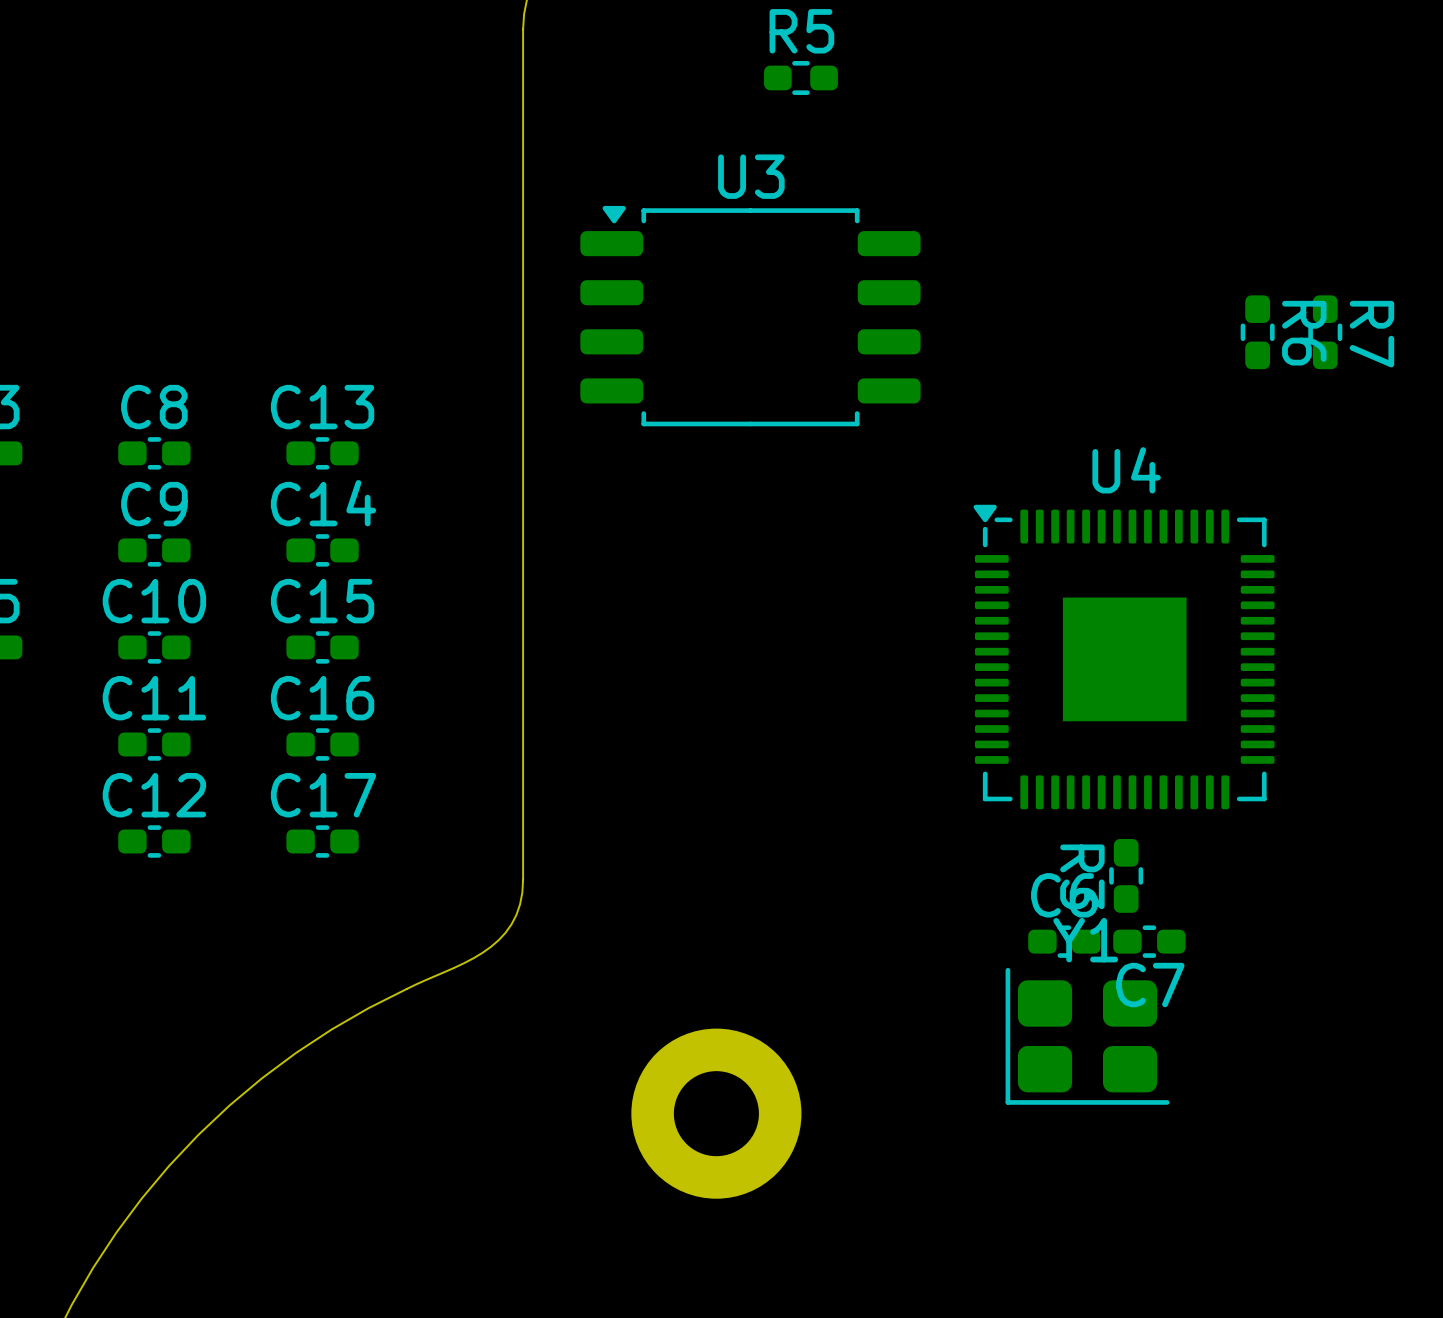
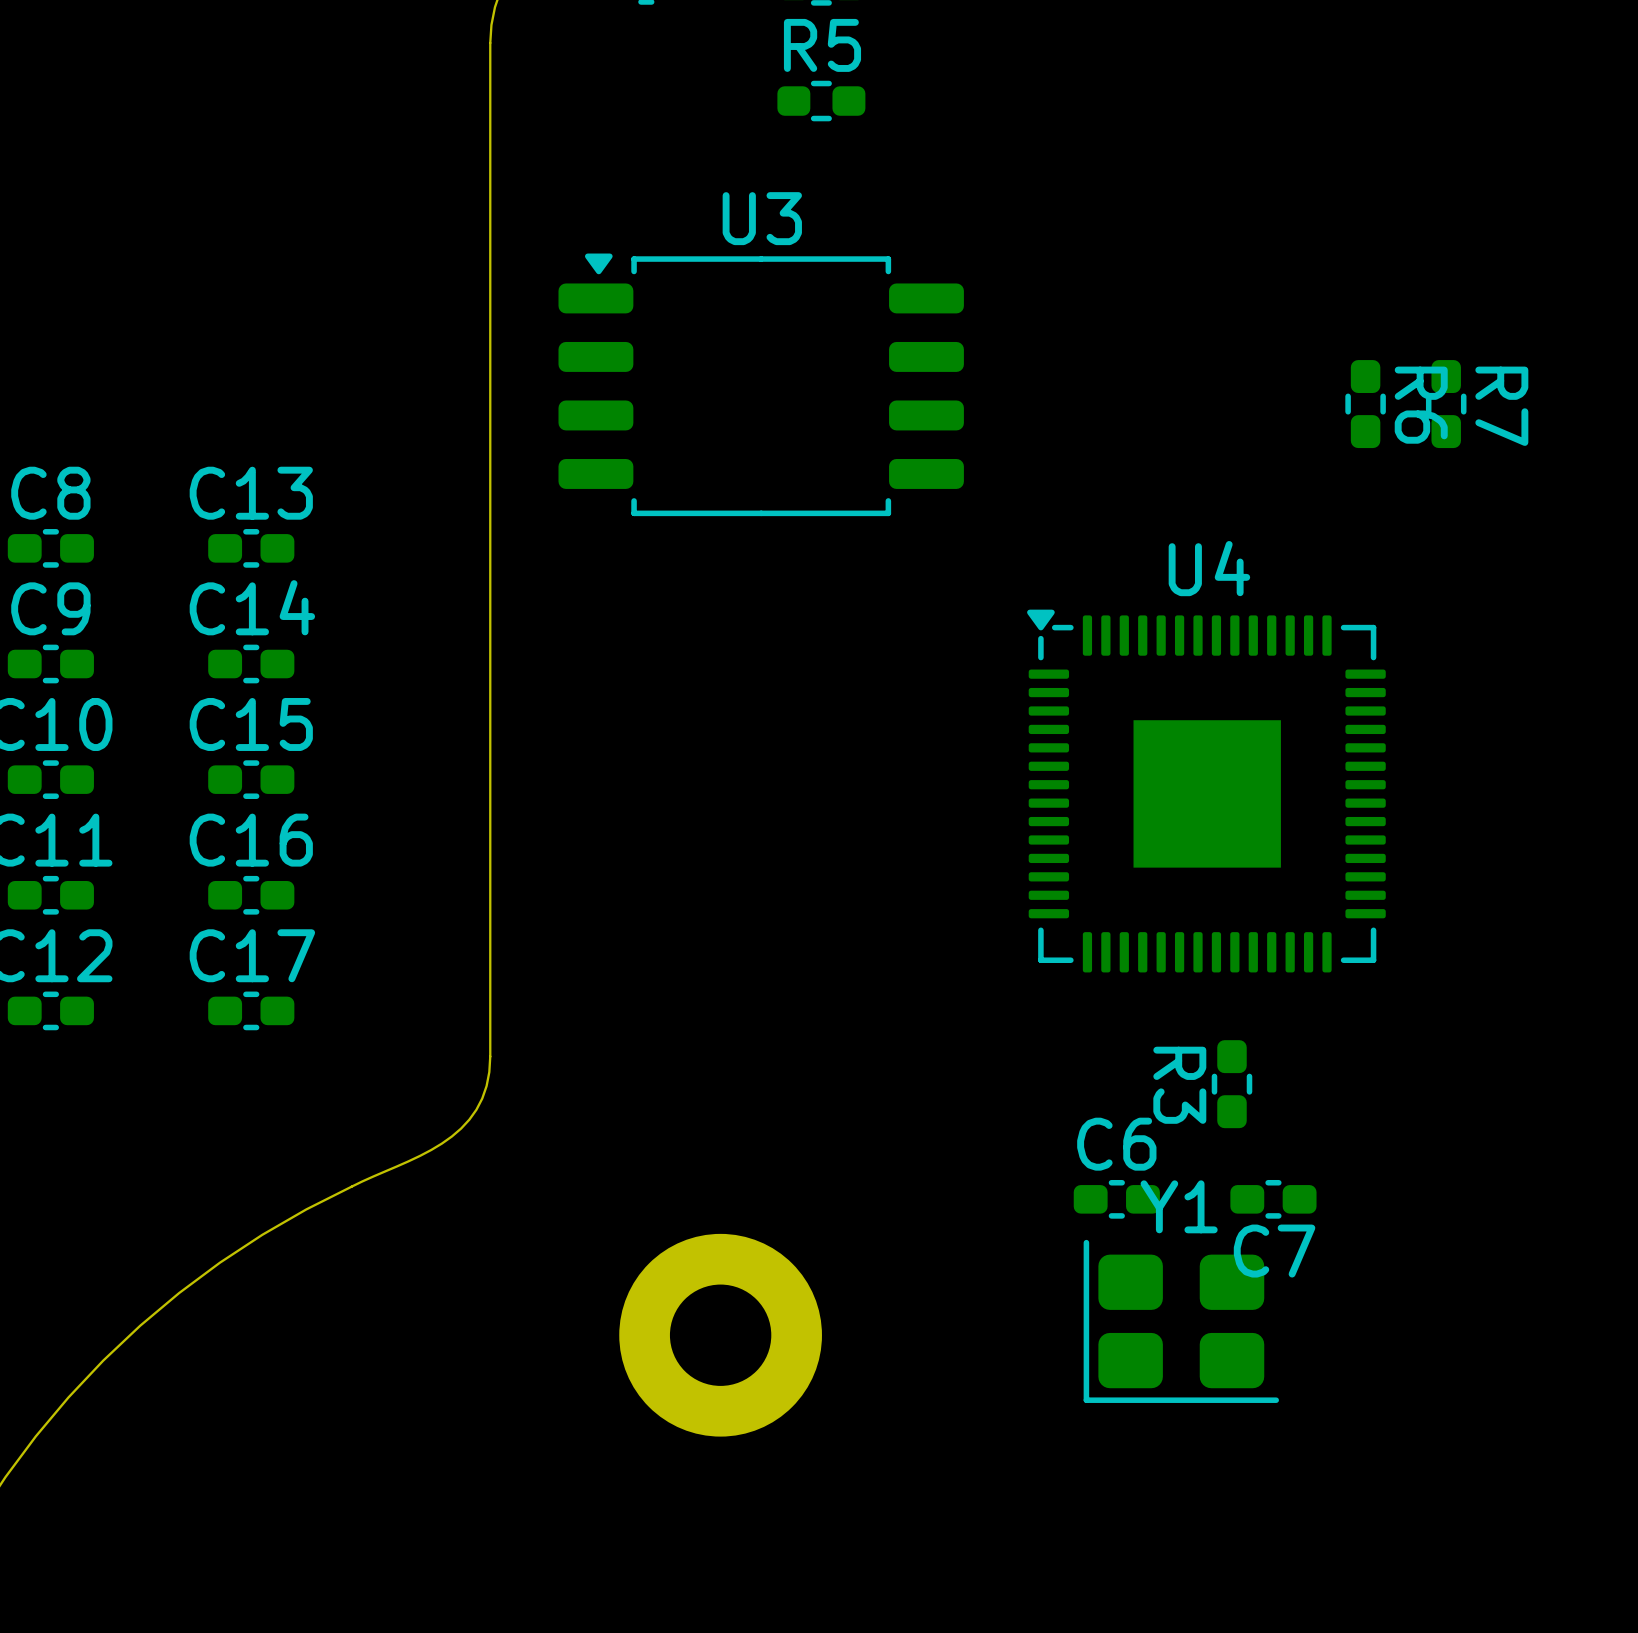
R3 position: (1126, 875) -> (1231, 1084)
C6 position: (1064, 941) -> (1116, 1199)
C7 position: (1149, 941) -> (1273, 1199)
Y1 position: (1087, 1036) -> (1181, 1321)

